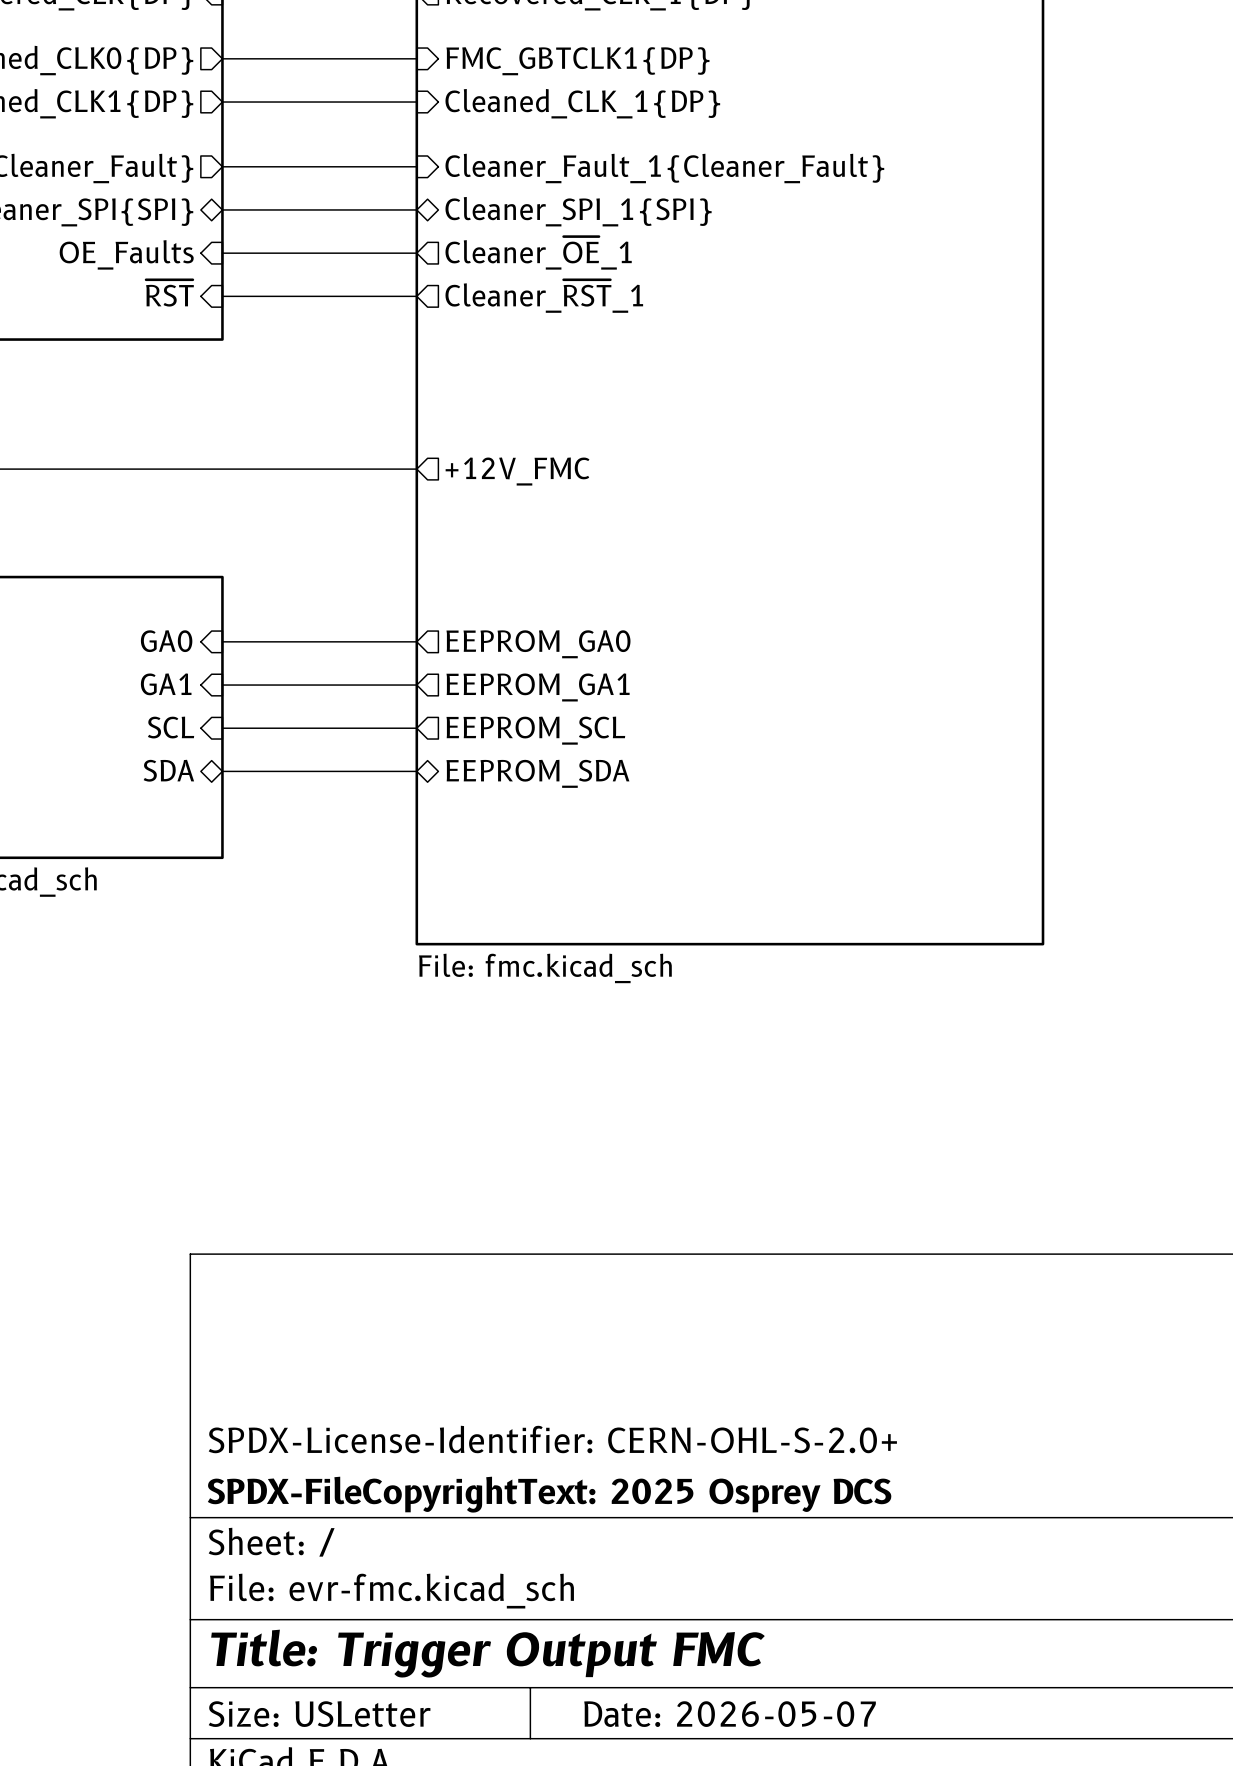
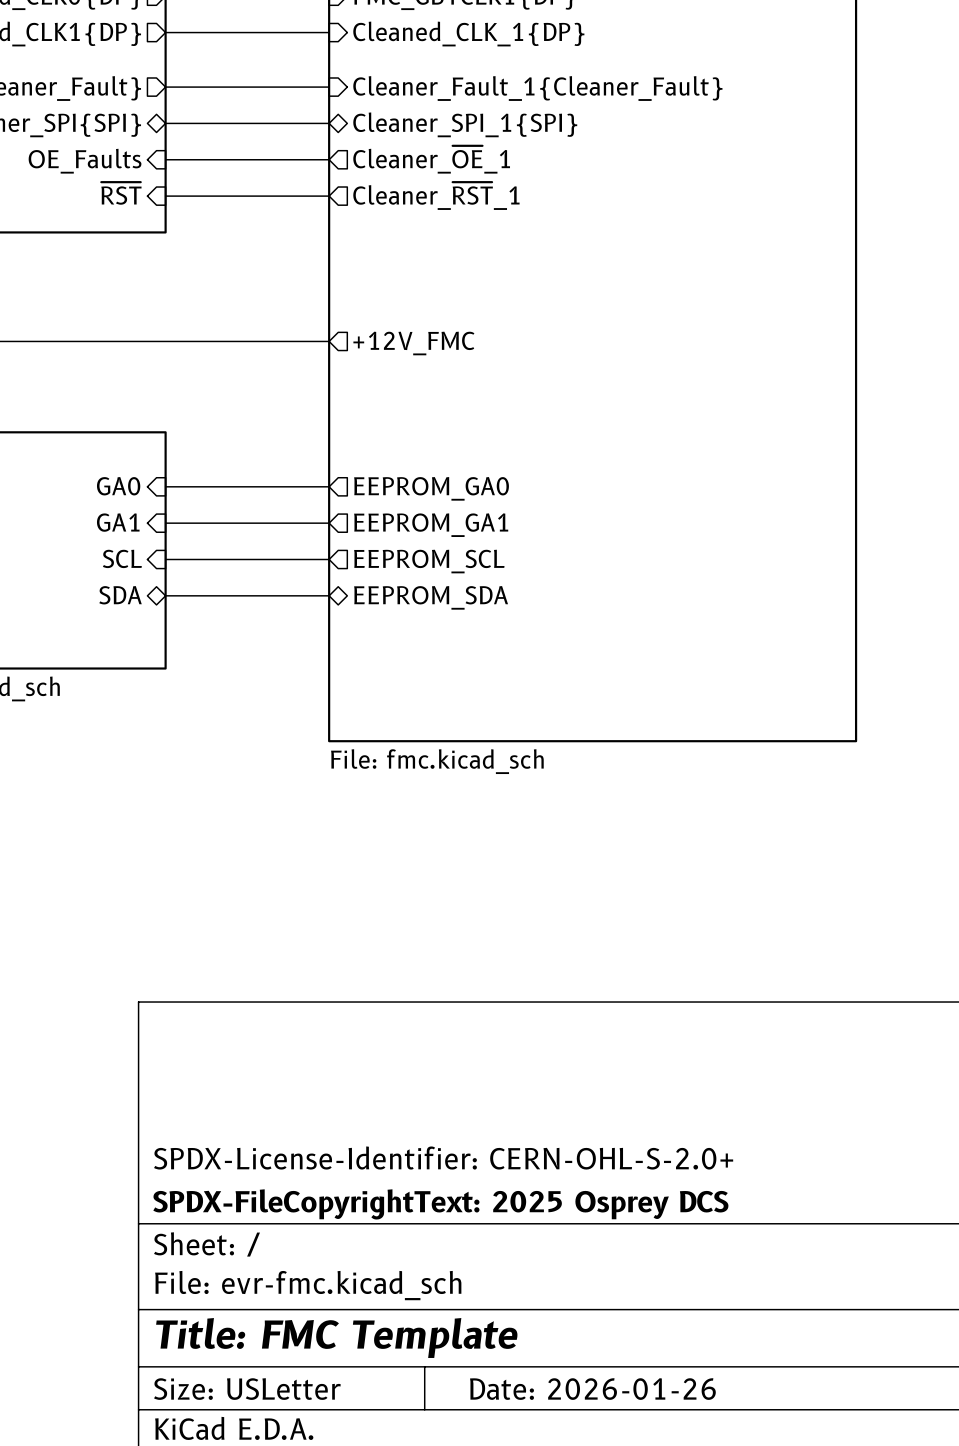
title block: Title: Trigger Output FMC (487, 1653) -> Title: FMC Template (336, 1338)
title block: Date: 2026-05-07 (730, 1714) -> Date: 2026-01-26 (592, 1389)

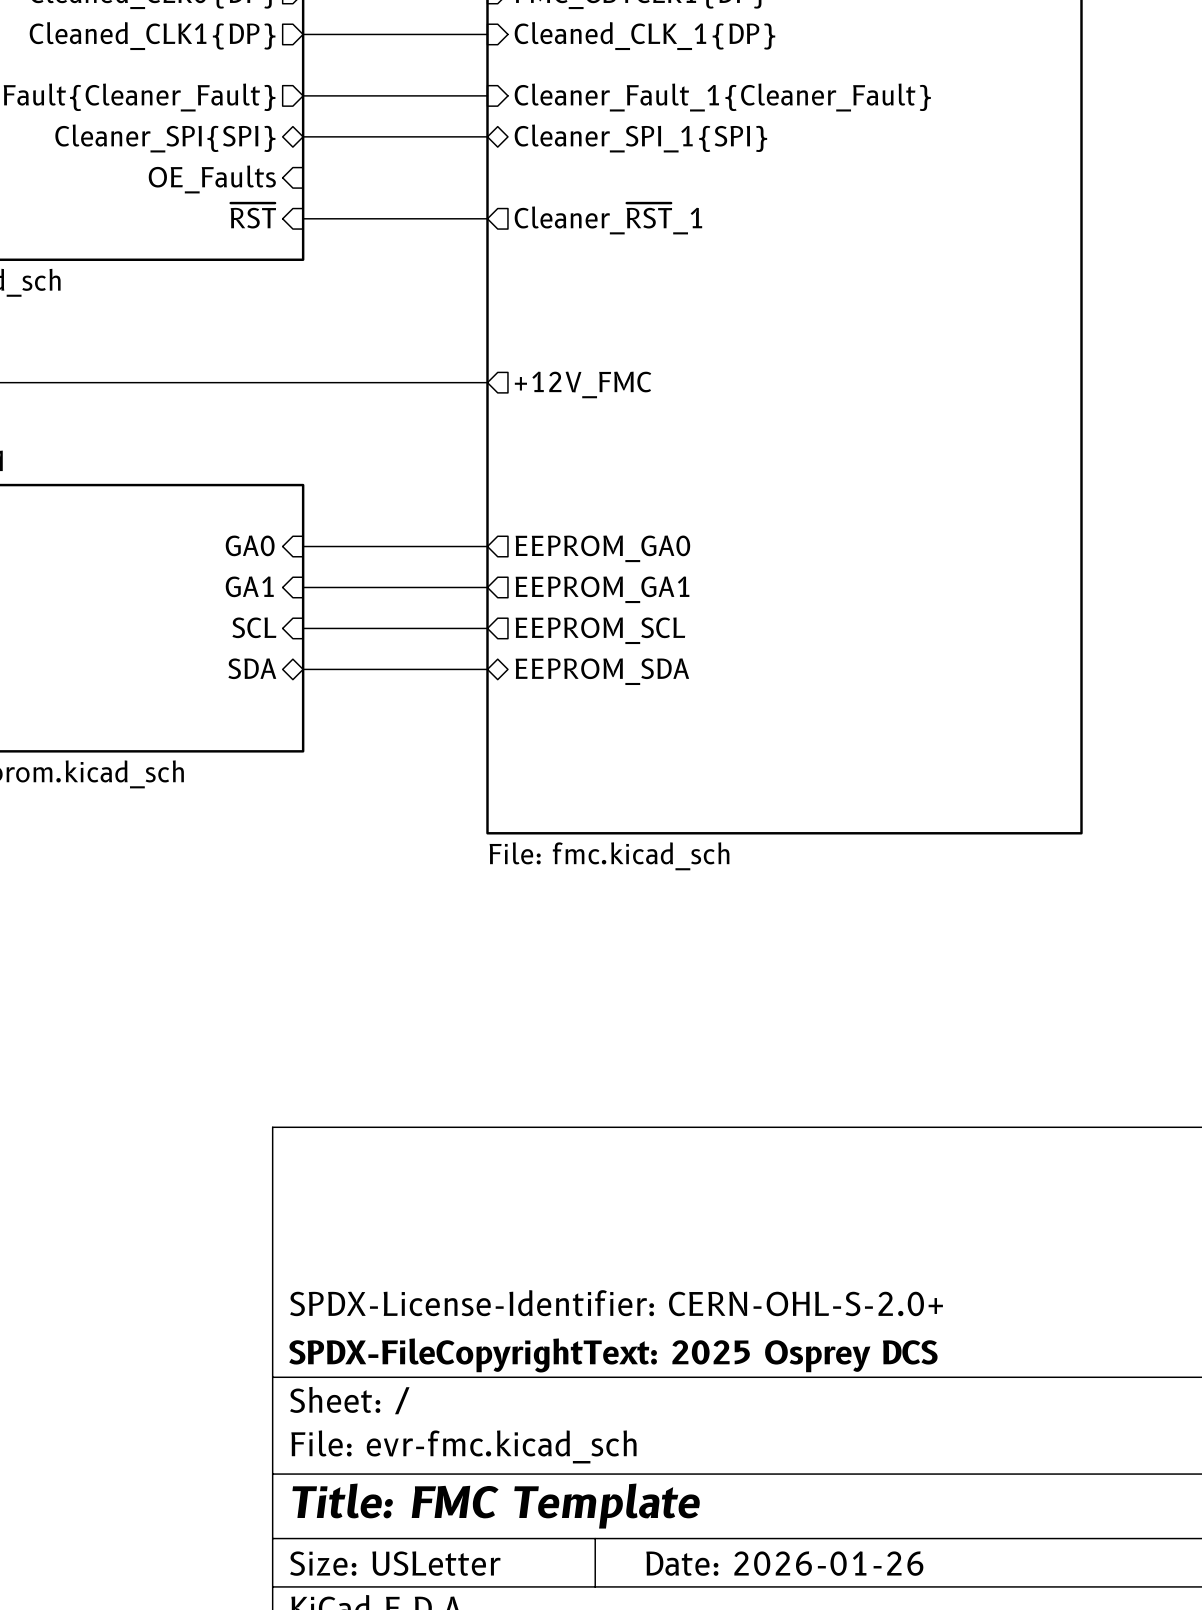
wire: (165, 159) (329, 159) -> none
sheet pin: Cleaner_~{OE}_1 (431, 159) -> none

